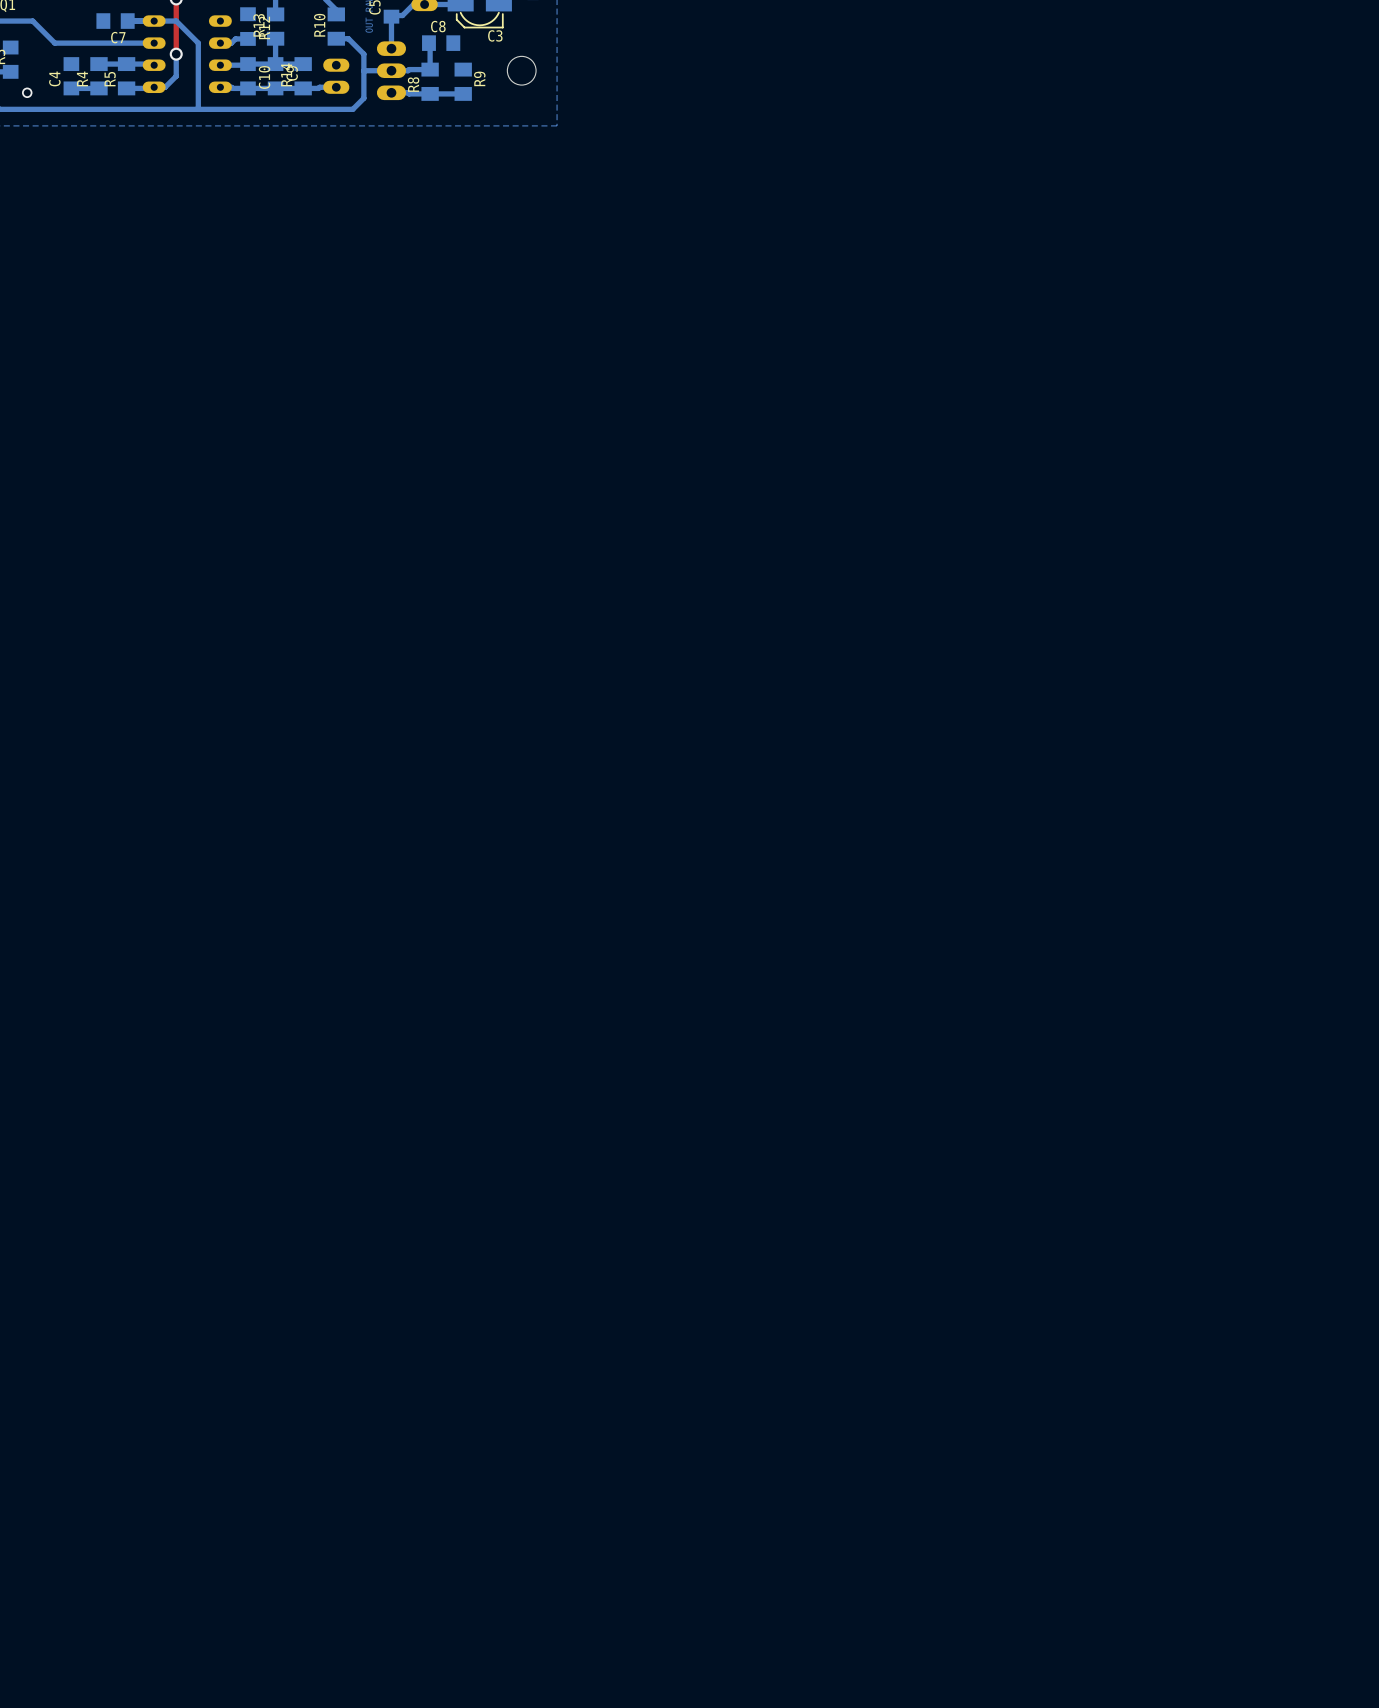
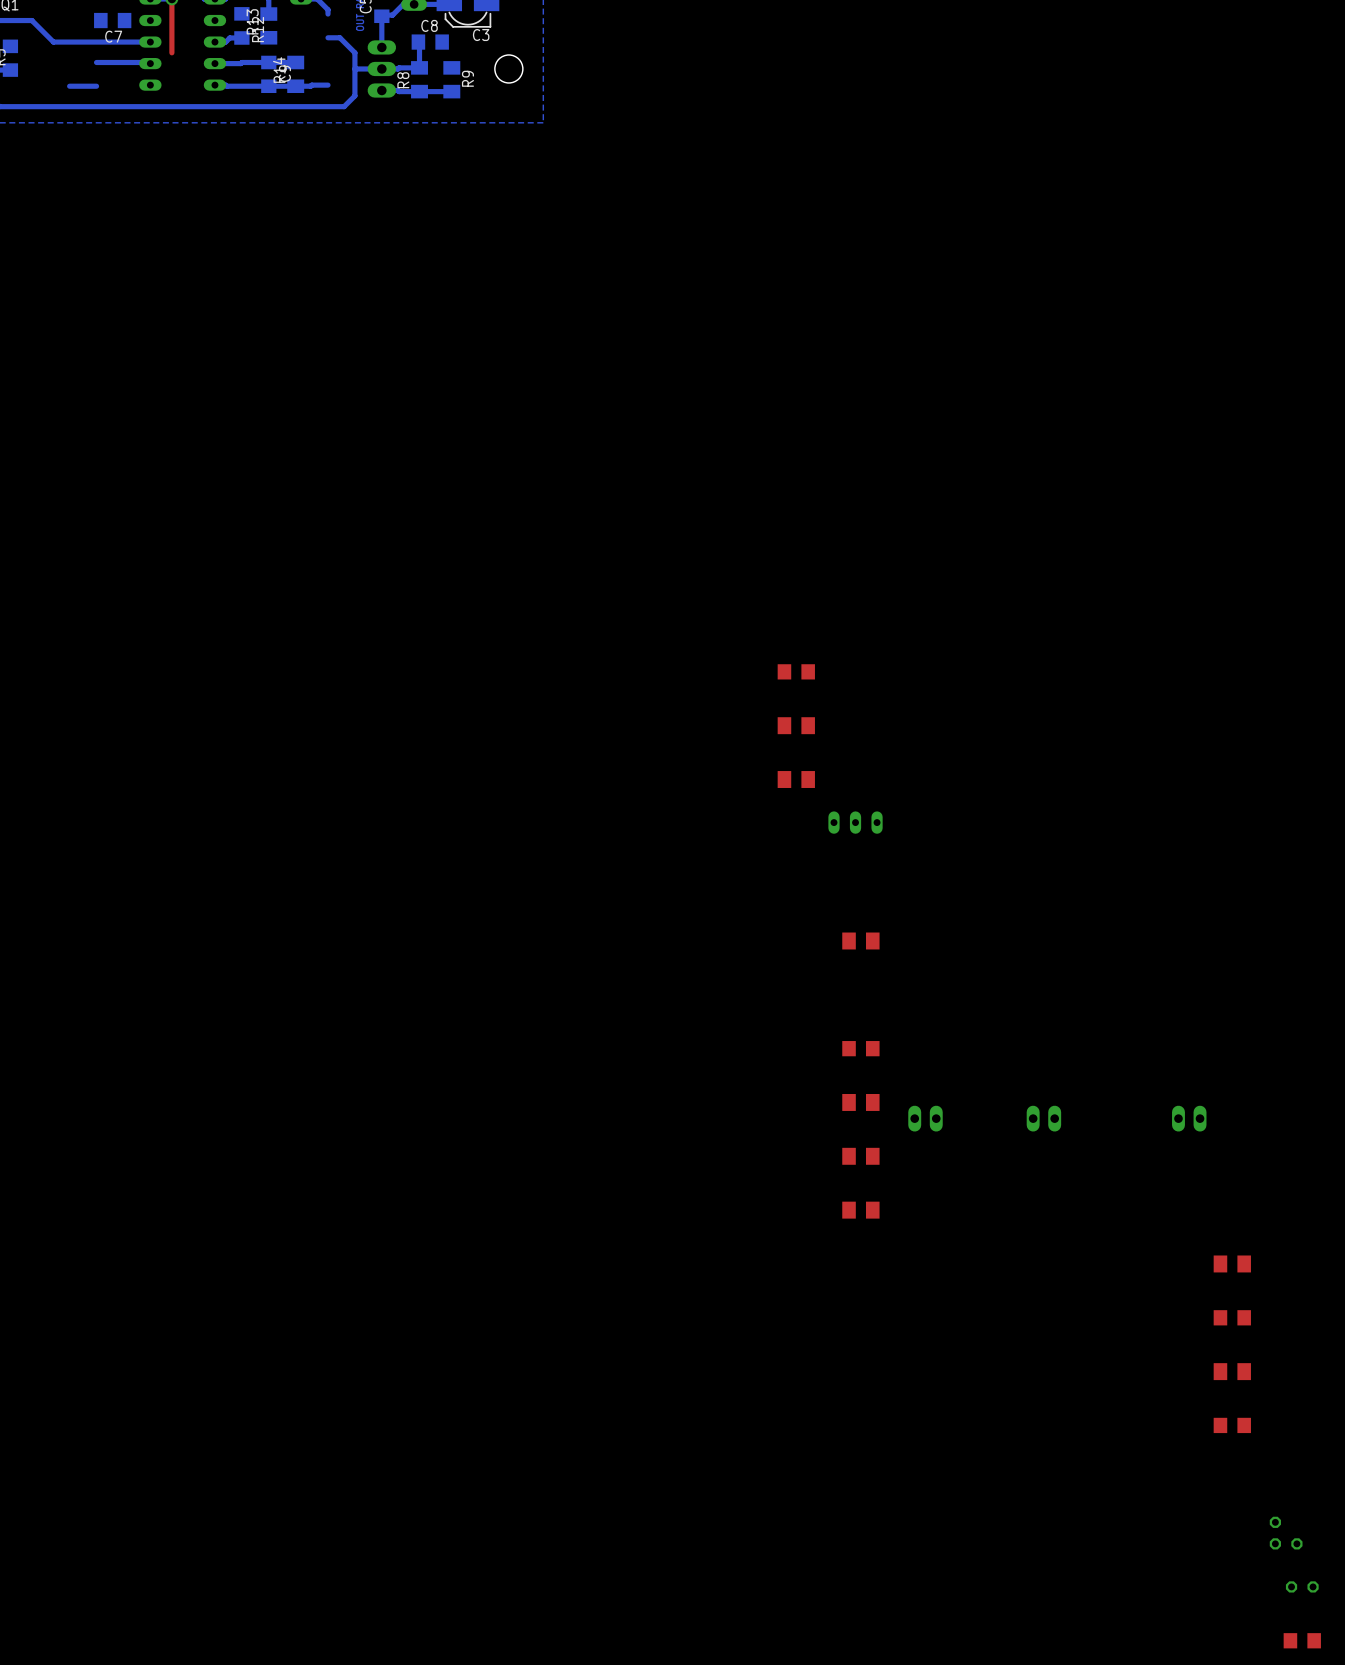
bottom track: (127, 21) (176, 21) (198, 43) (198, 109) -> none
R10: (336, 26) -> none
bottom track: (275, 38) (275, 64) -> none
bottom track: (176, 54) (176, 76) (165, 87) (126, 88) -> none
via: (176, 54) -> none
C4: (71, 76) -> none
R4: (98, 76) -> none
R5: (126, 76) -> none
C10: (247, 76) -> none
part: (336, 76) -> none
via: (27, 92) -> none
part: none -> (796, 671)
part: none -> (796, 725)
part: none -> (796, 779)
part: none -> (855, 822)
part: none -> (860, 940)
part: none -> (860, 1048)
part: none -> (860, 1102)
part: none -> (925, 1118)
part: none -> (1043, 1118)
part: none -> (1189, 1118)
part: none -> (860, 1156)
part: none -> (860, 1210)
part: none -> (1232, 1263)
part: none -> (1232, 1317)
part: none -> (1232, 1371)
part: none -> (1232, 1425)
part: none -> (1286, 1533)
part: none -> (1302, 1586)
part: none -> (1302, 1640)

